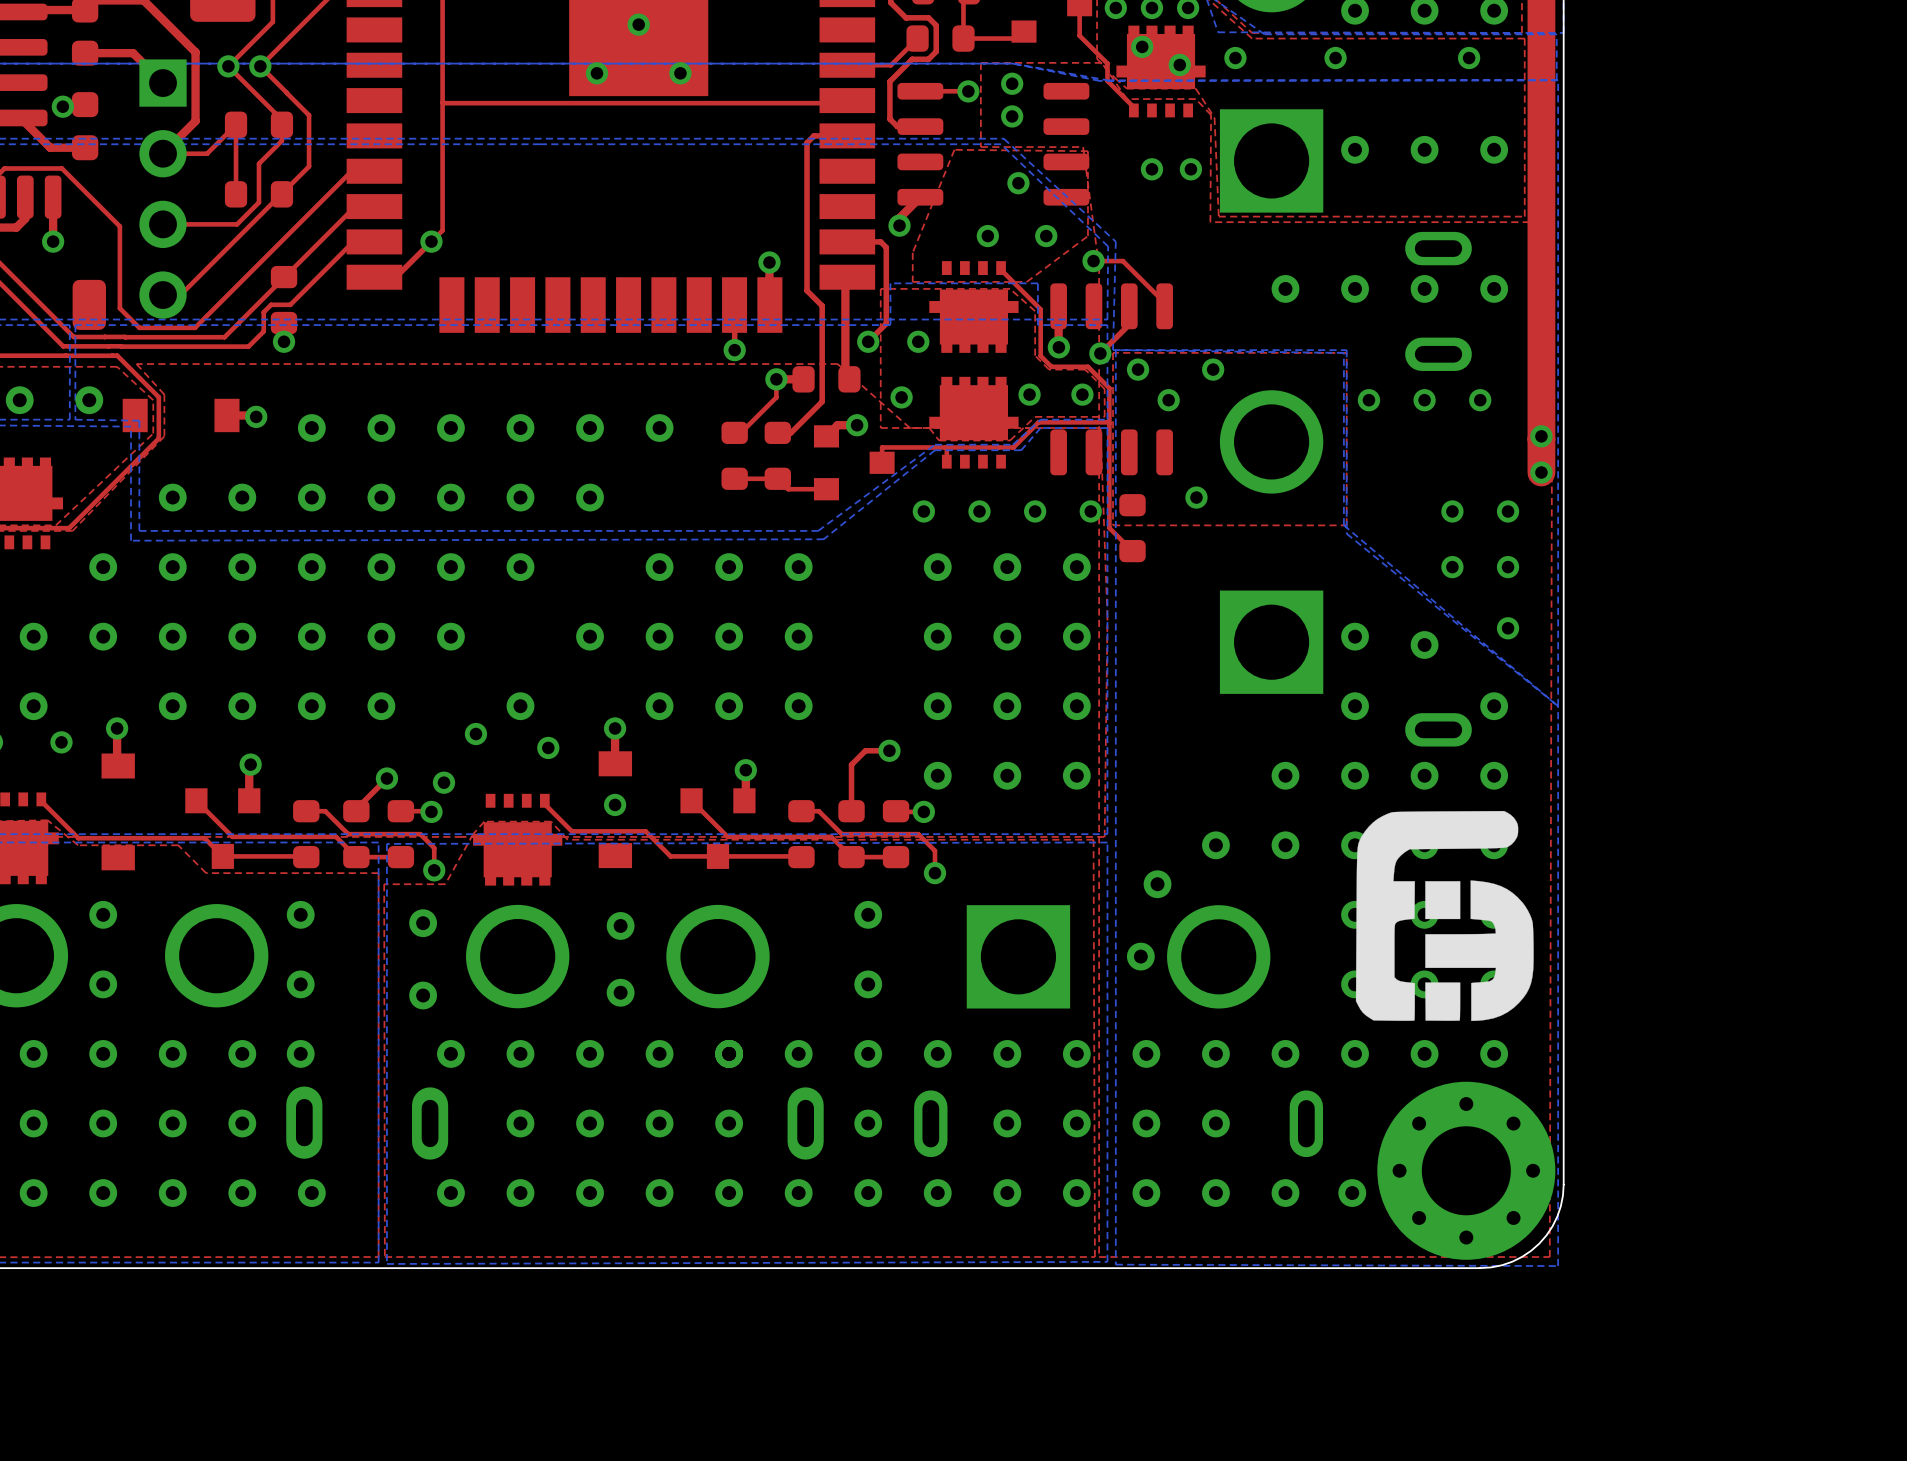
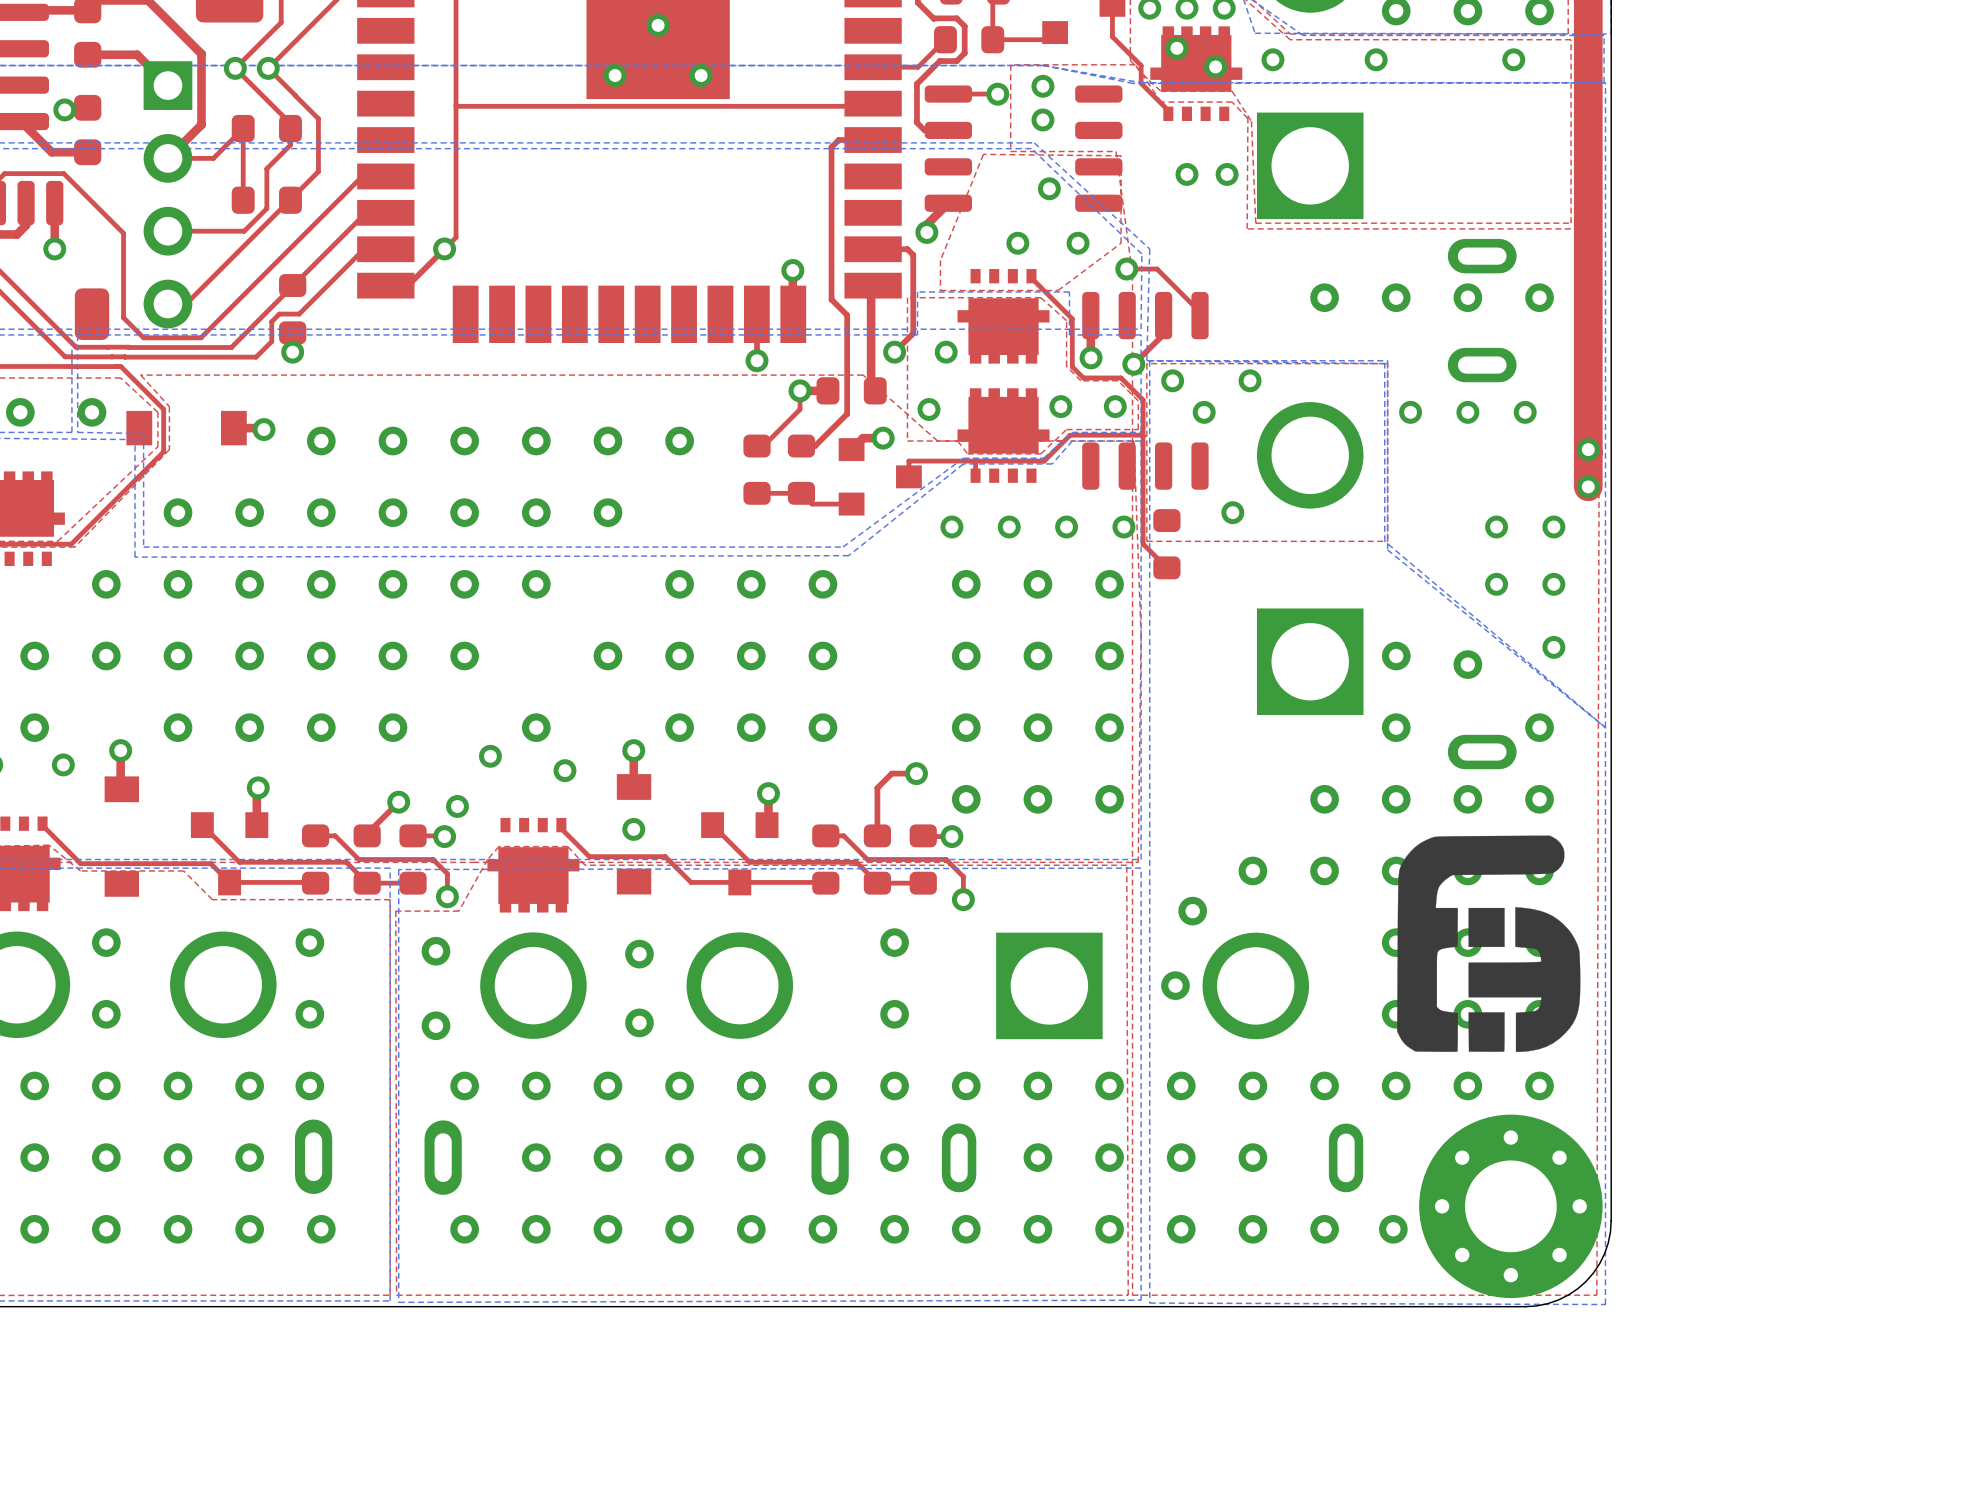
via: (1355, 149) -> none
via: (1424, 149) -> none
via: (1494, 149) -> none

